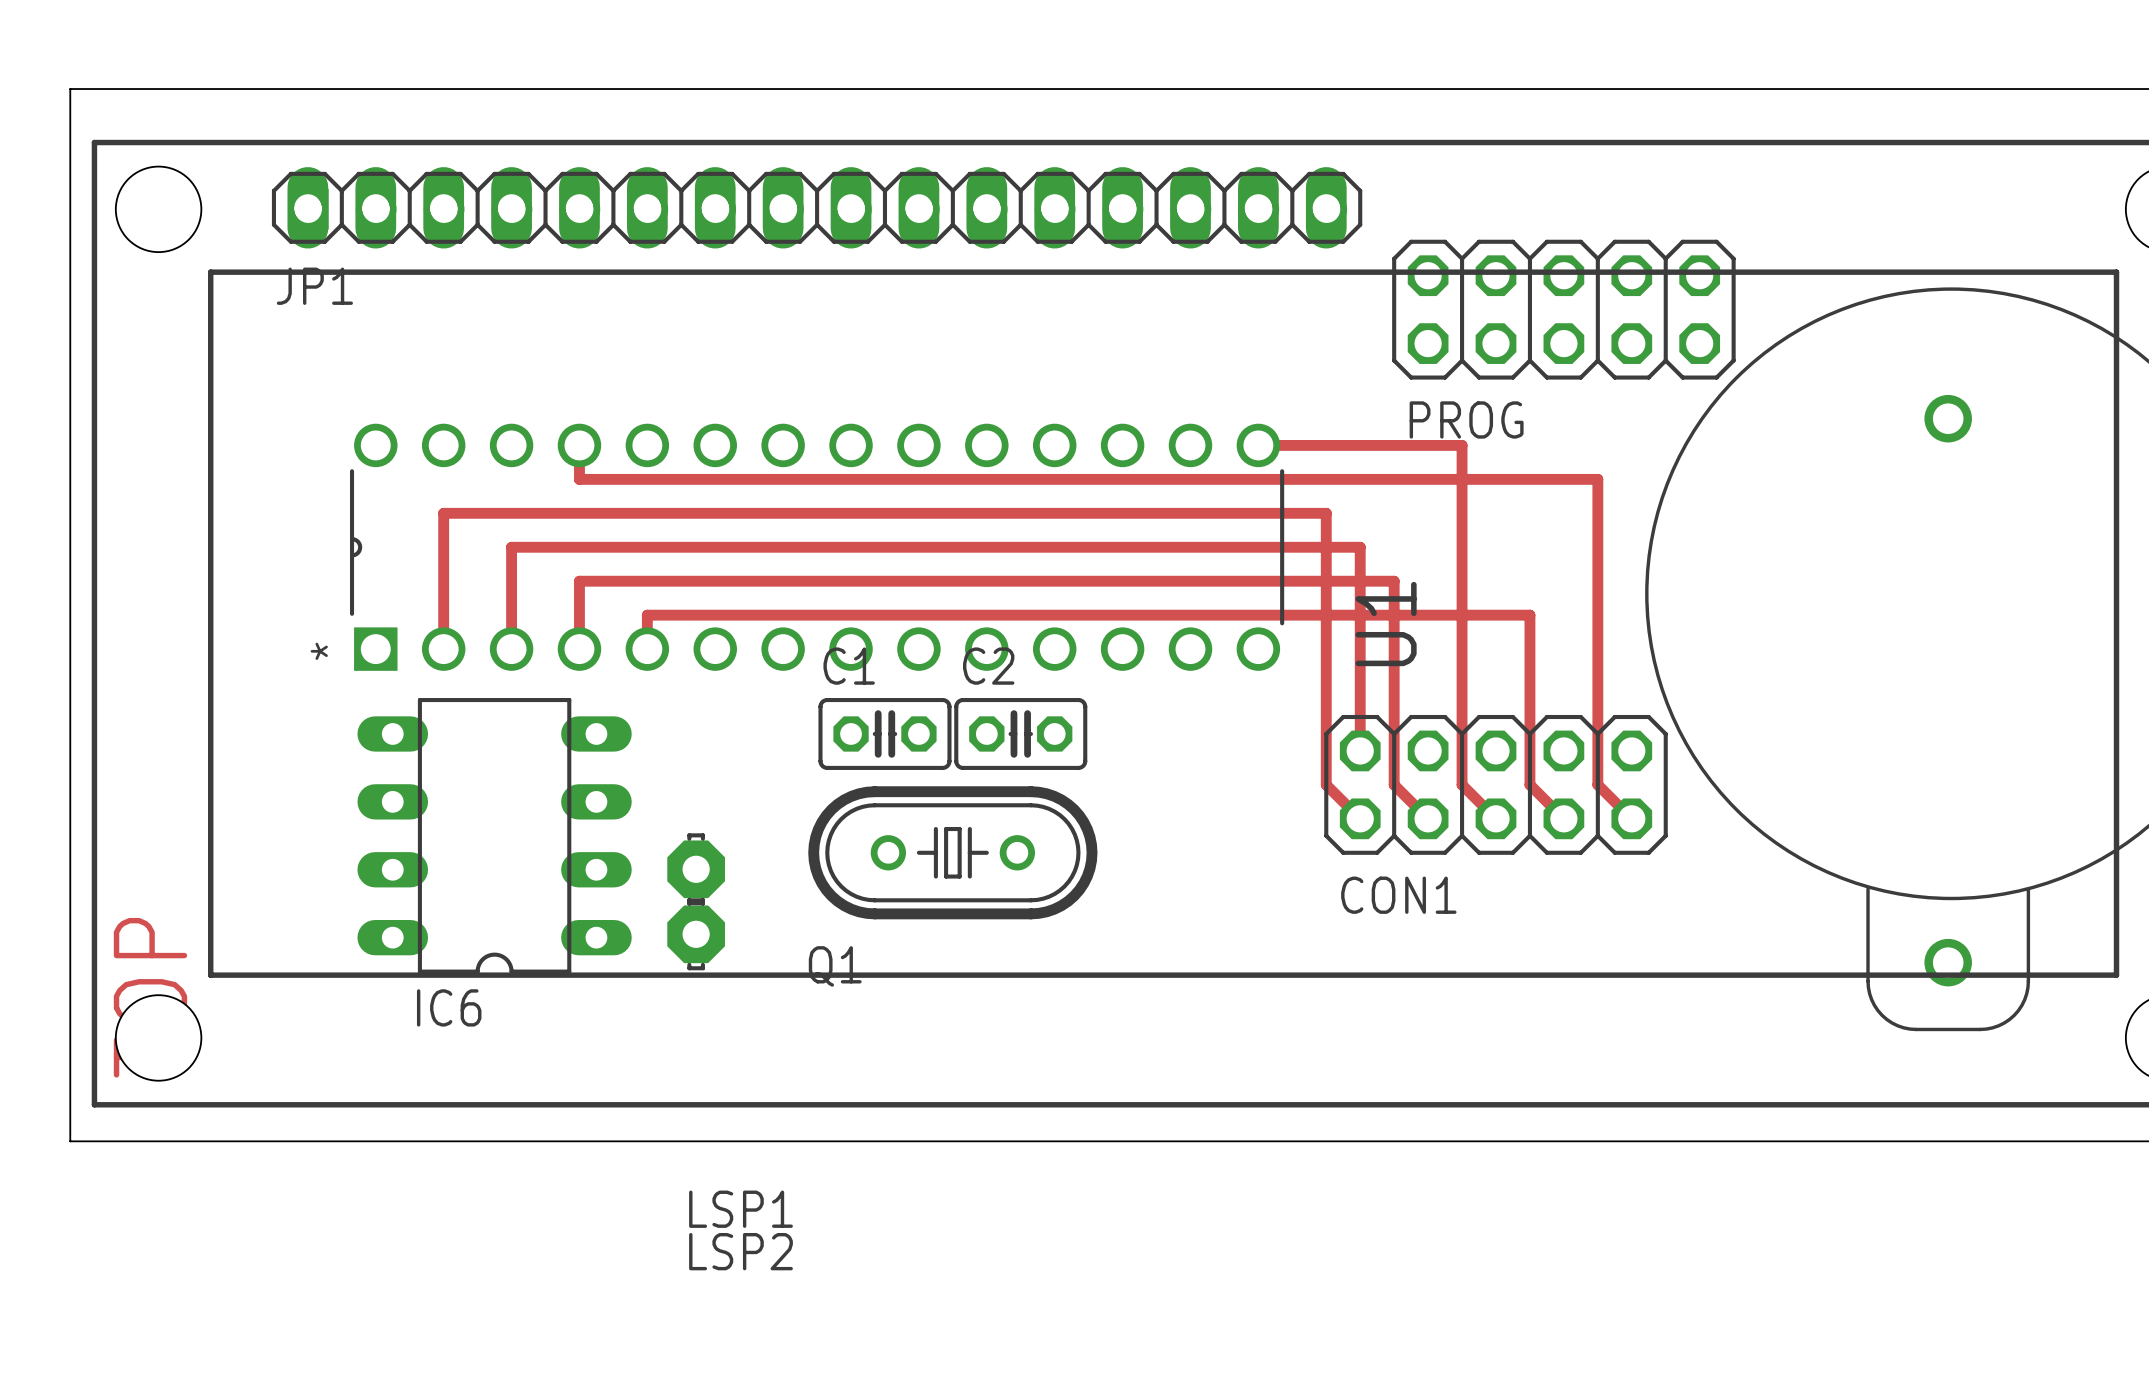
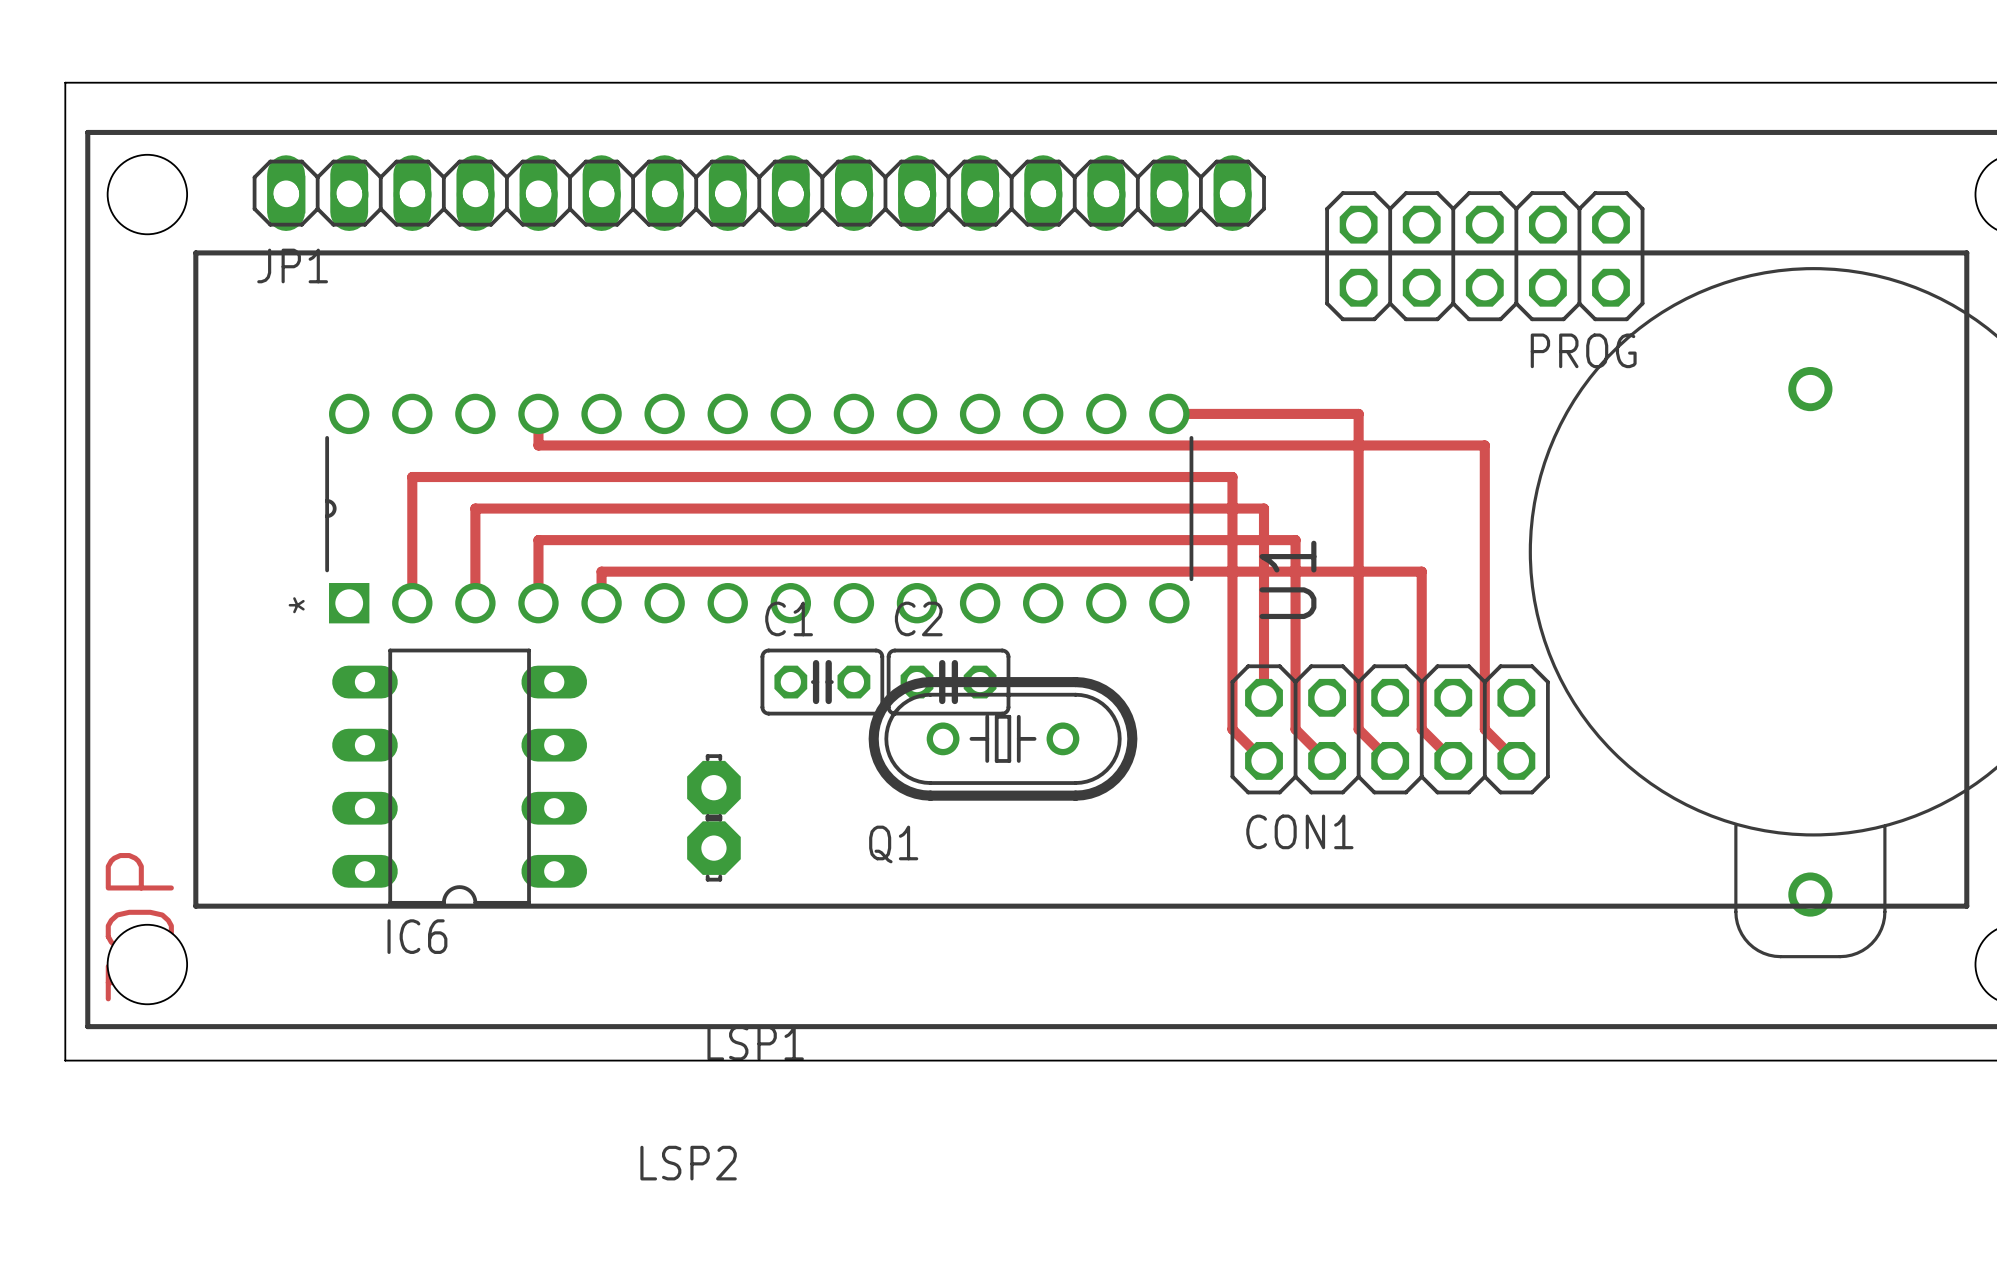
PROG position: (1563, 309) -> (1484, 256)
PROG name position: PROG (1466, 419) -> PROG (1583, 350)
Q1 position: (952, 852) -> (1003, 738)
LSP2 position: (696, 869) -> (713, 848)
LSP1 position: (696, 934) -> (713, 787)

